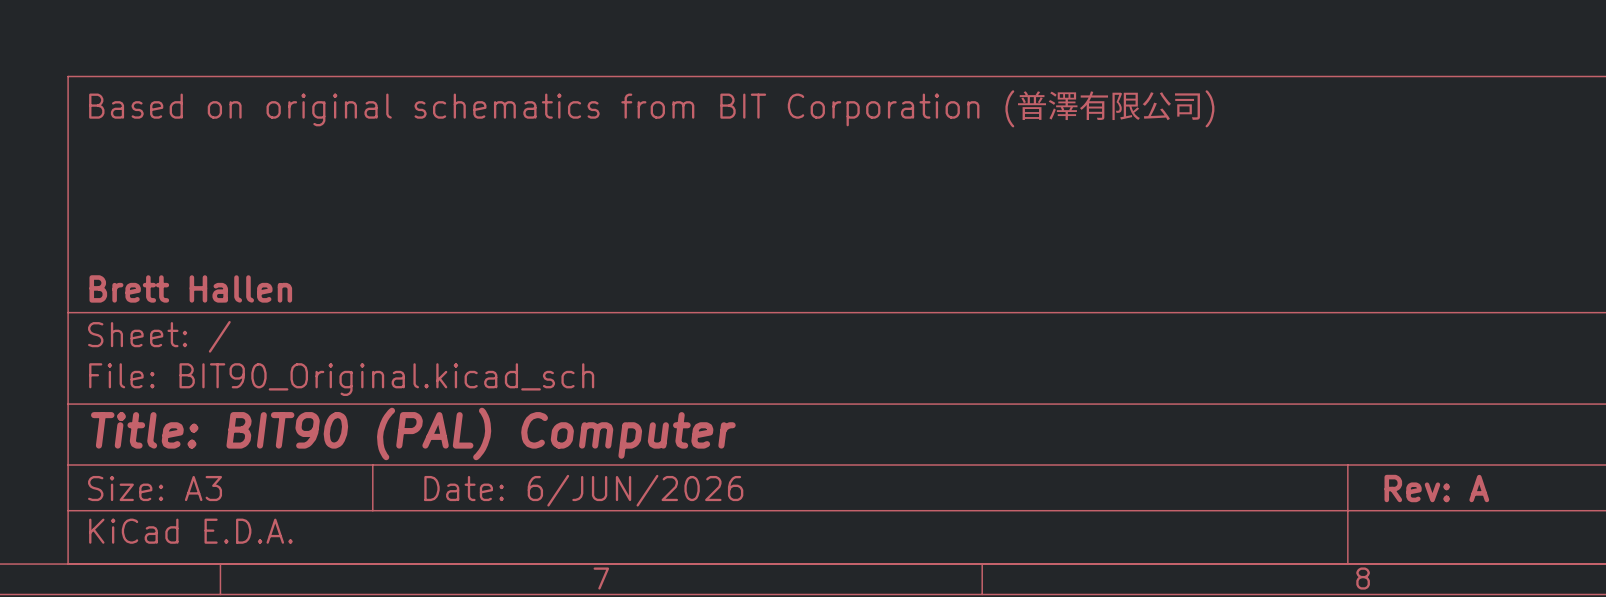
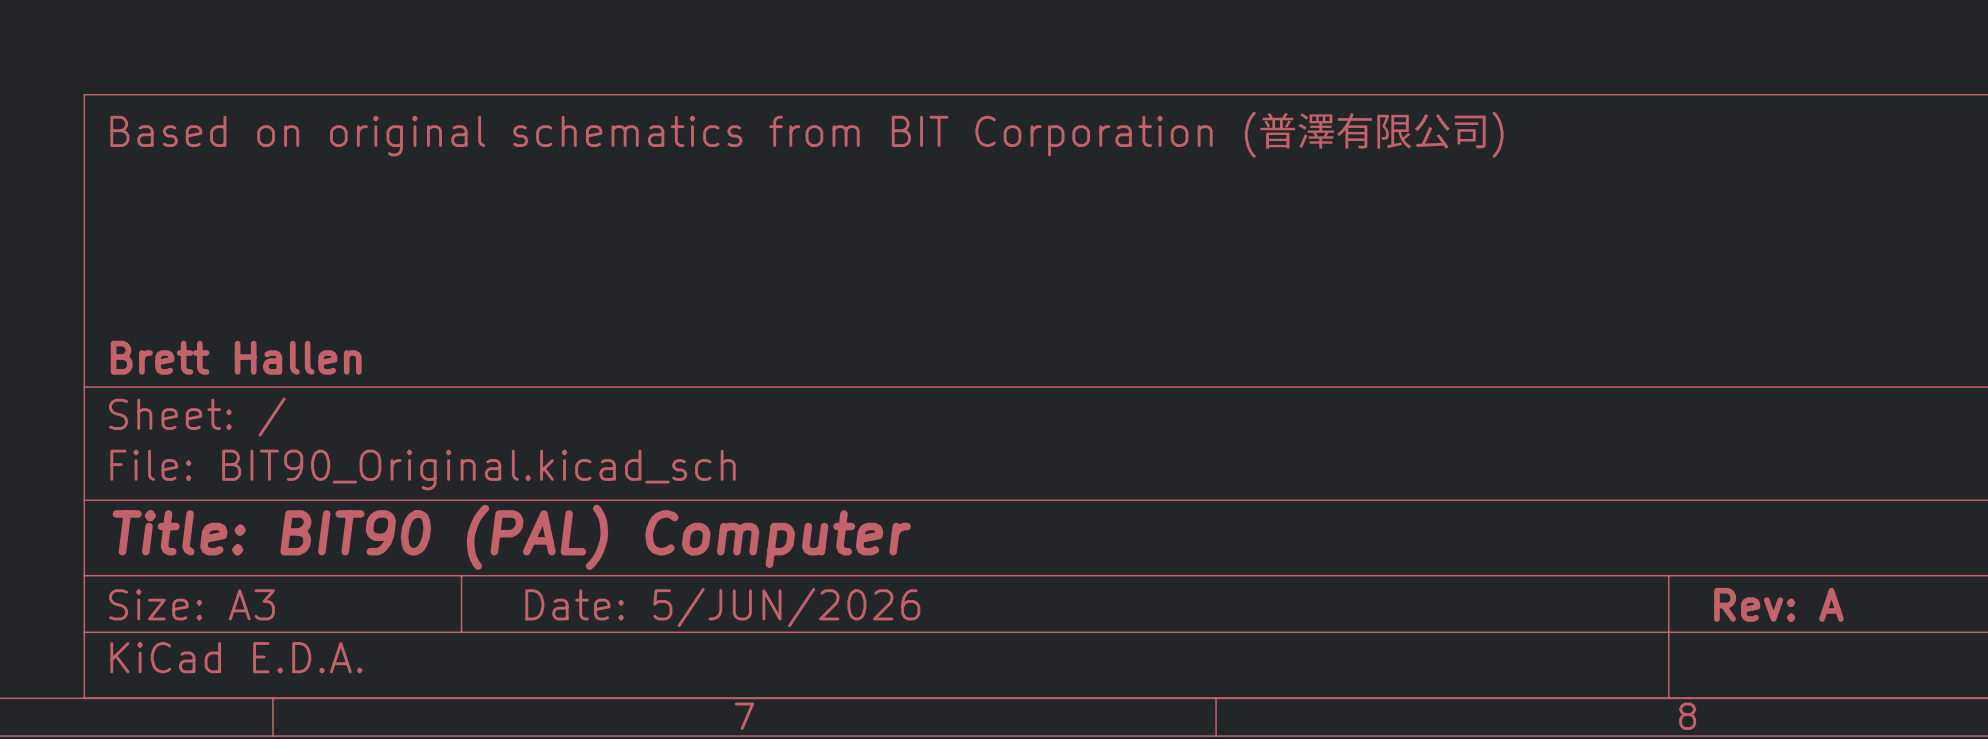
title block: Date: 6/JUN/2026 (583, 490) -> Date: 5/JUN/2026 (722, 607)

